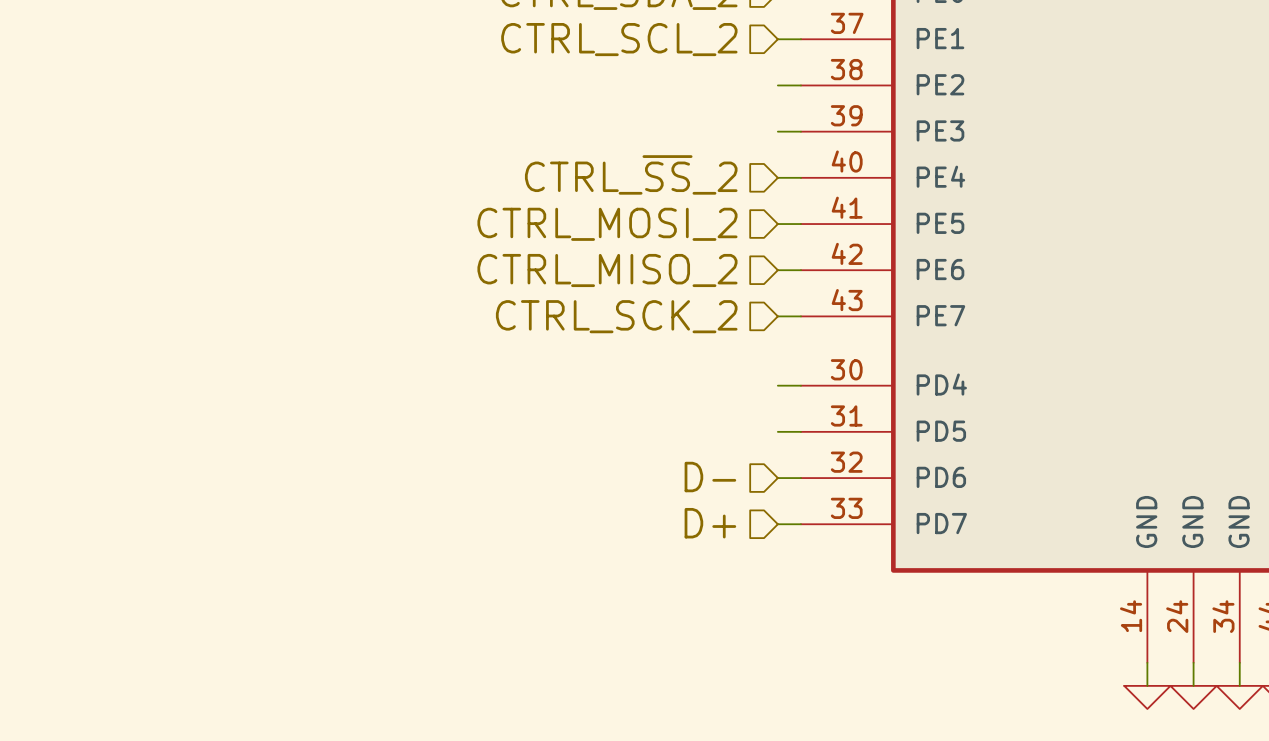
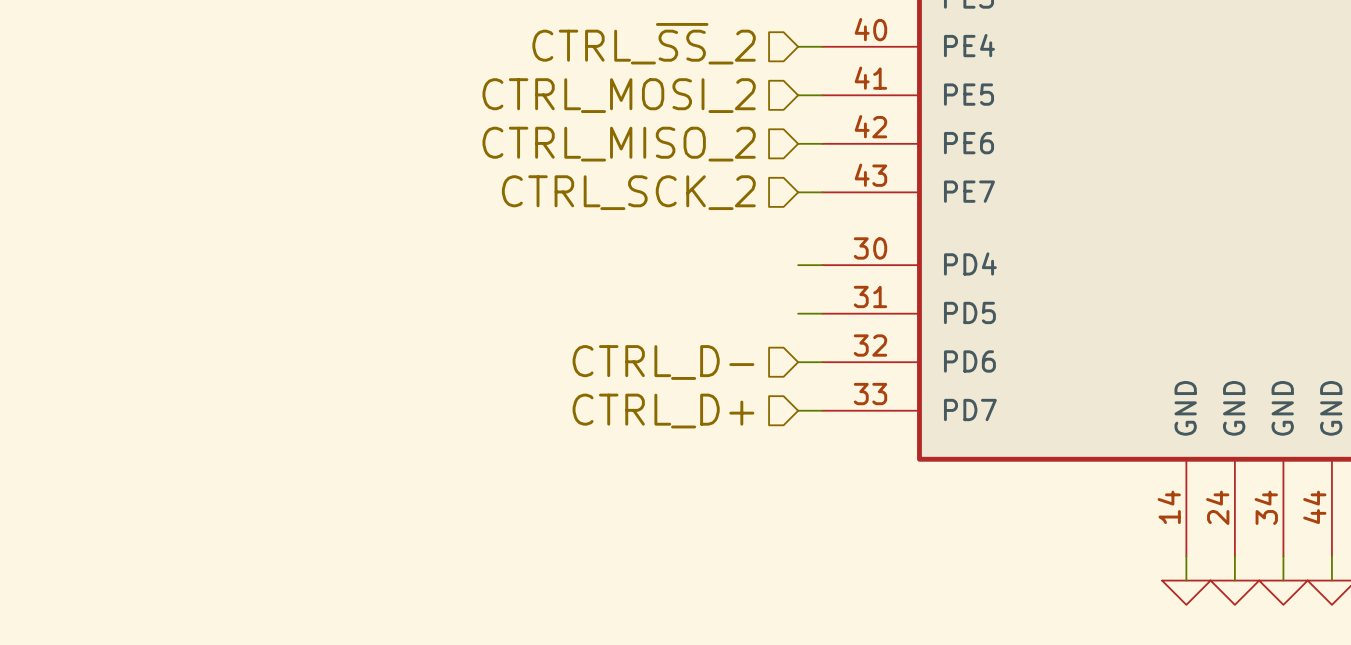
hierarchical label: D- (710, 477) -> CTRL_D- (663, 362)
hierarchical label: D+ (710, 523) -> CTRL_D+ (663, 411)

